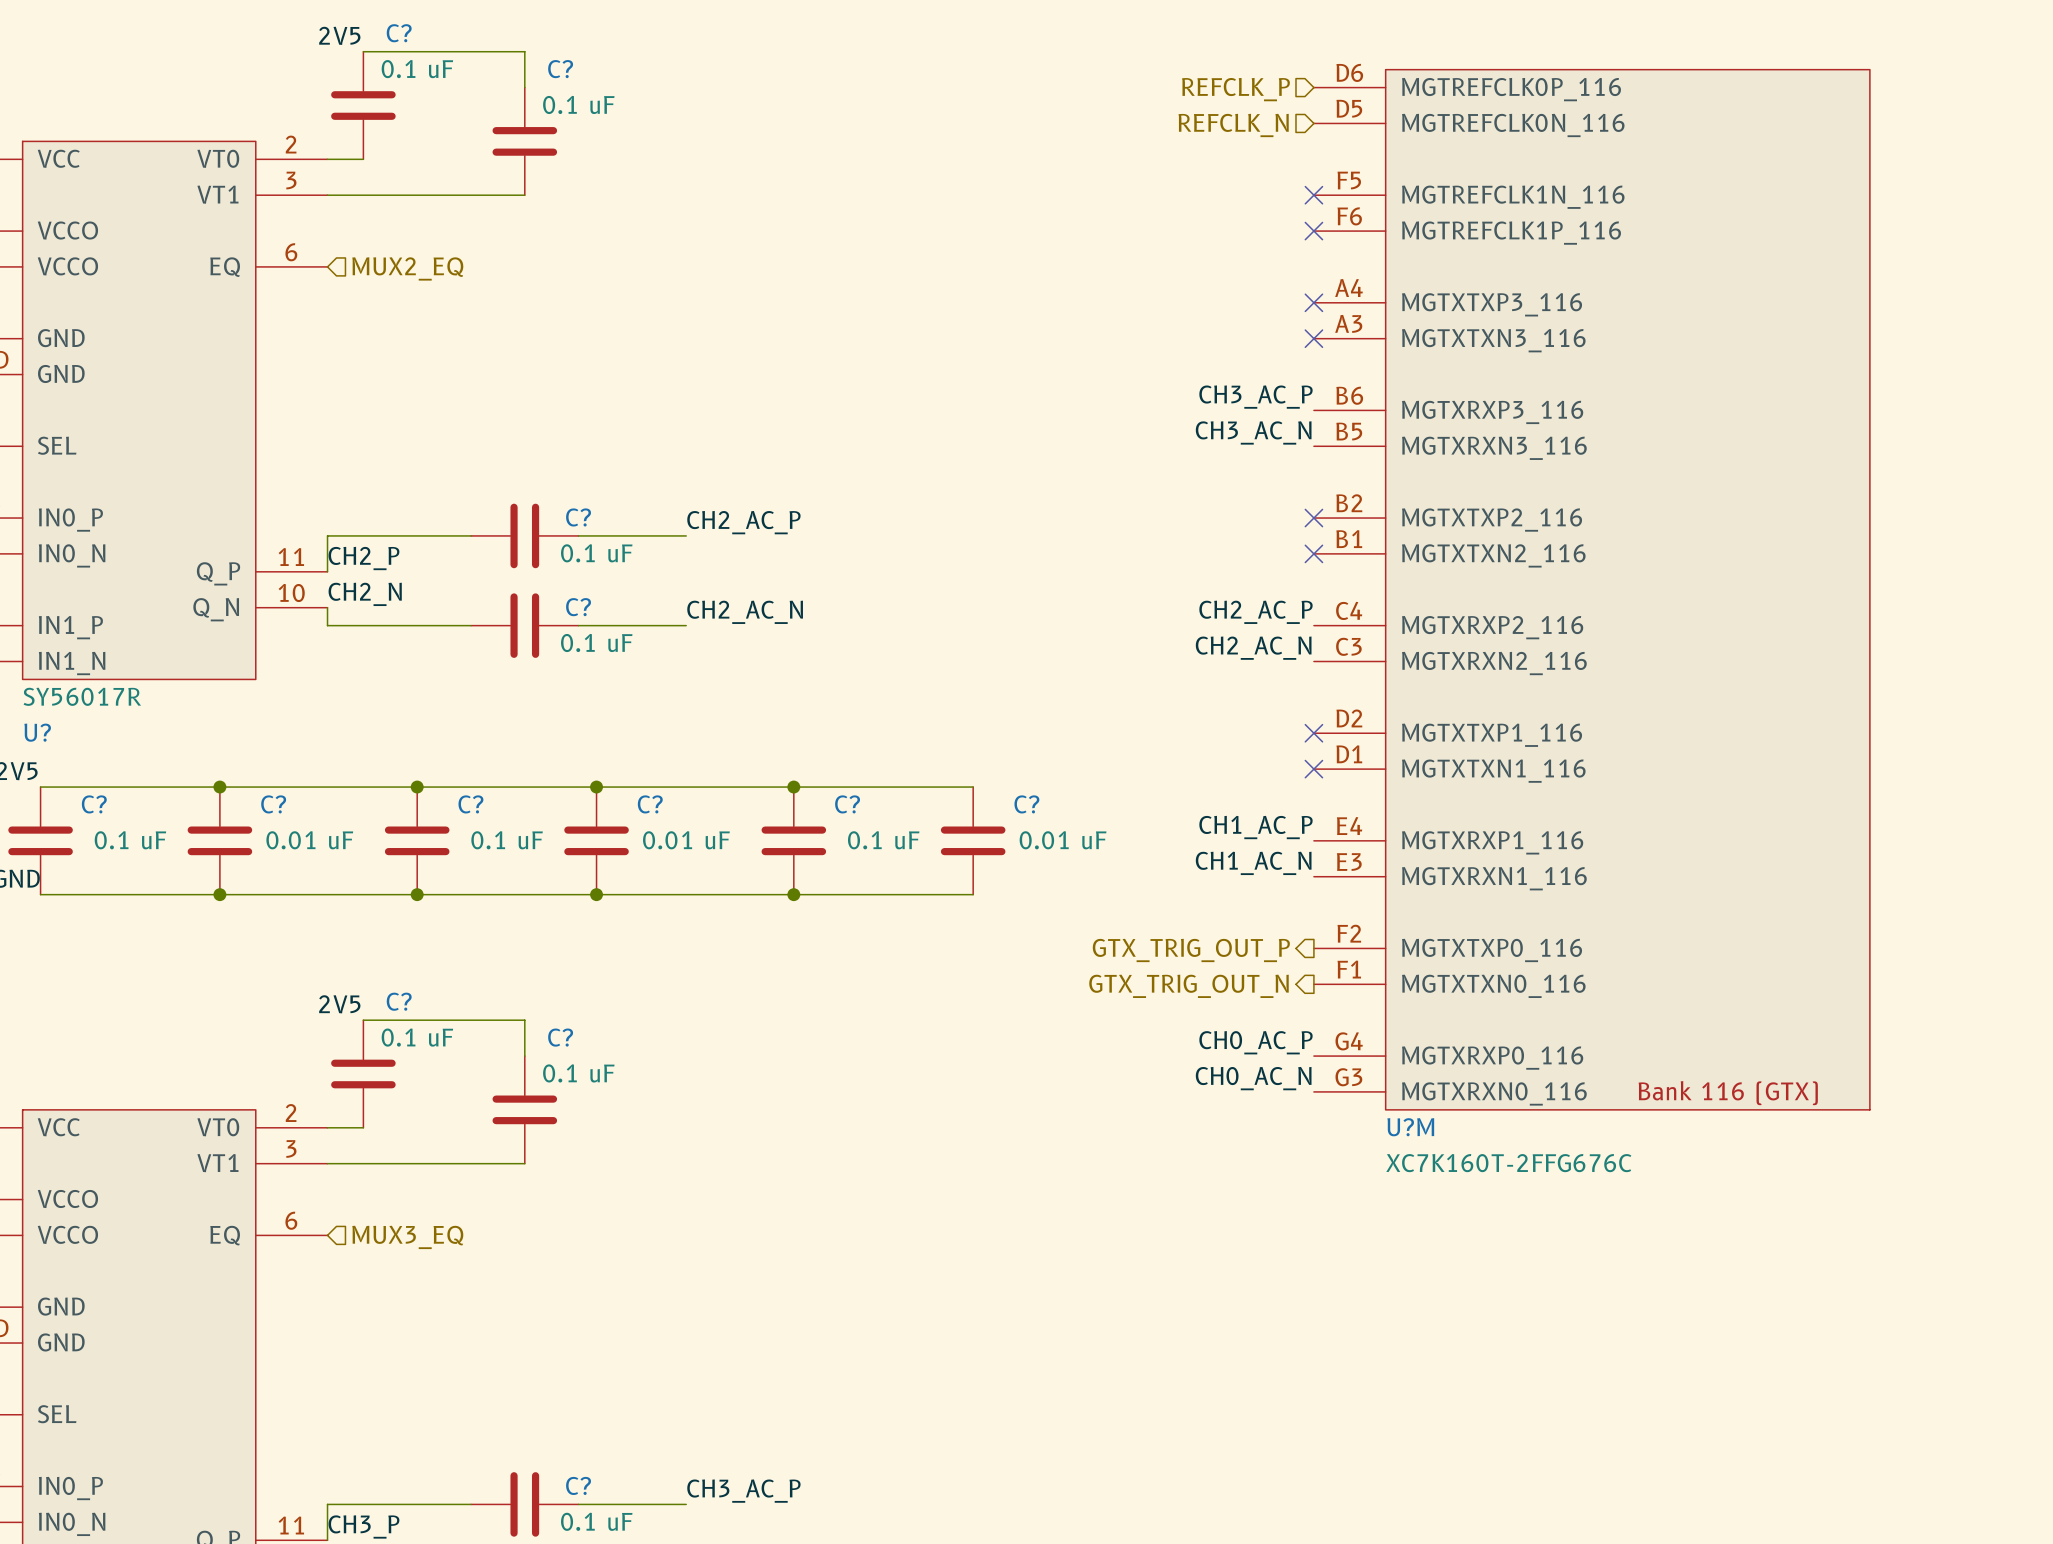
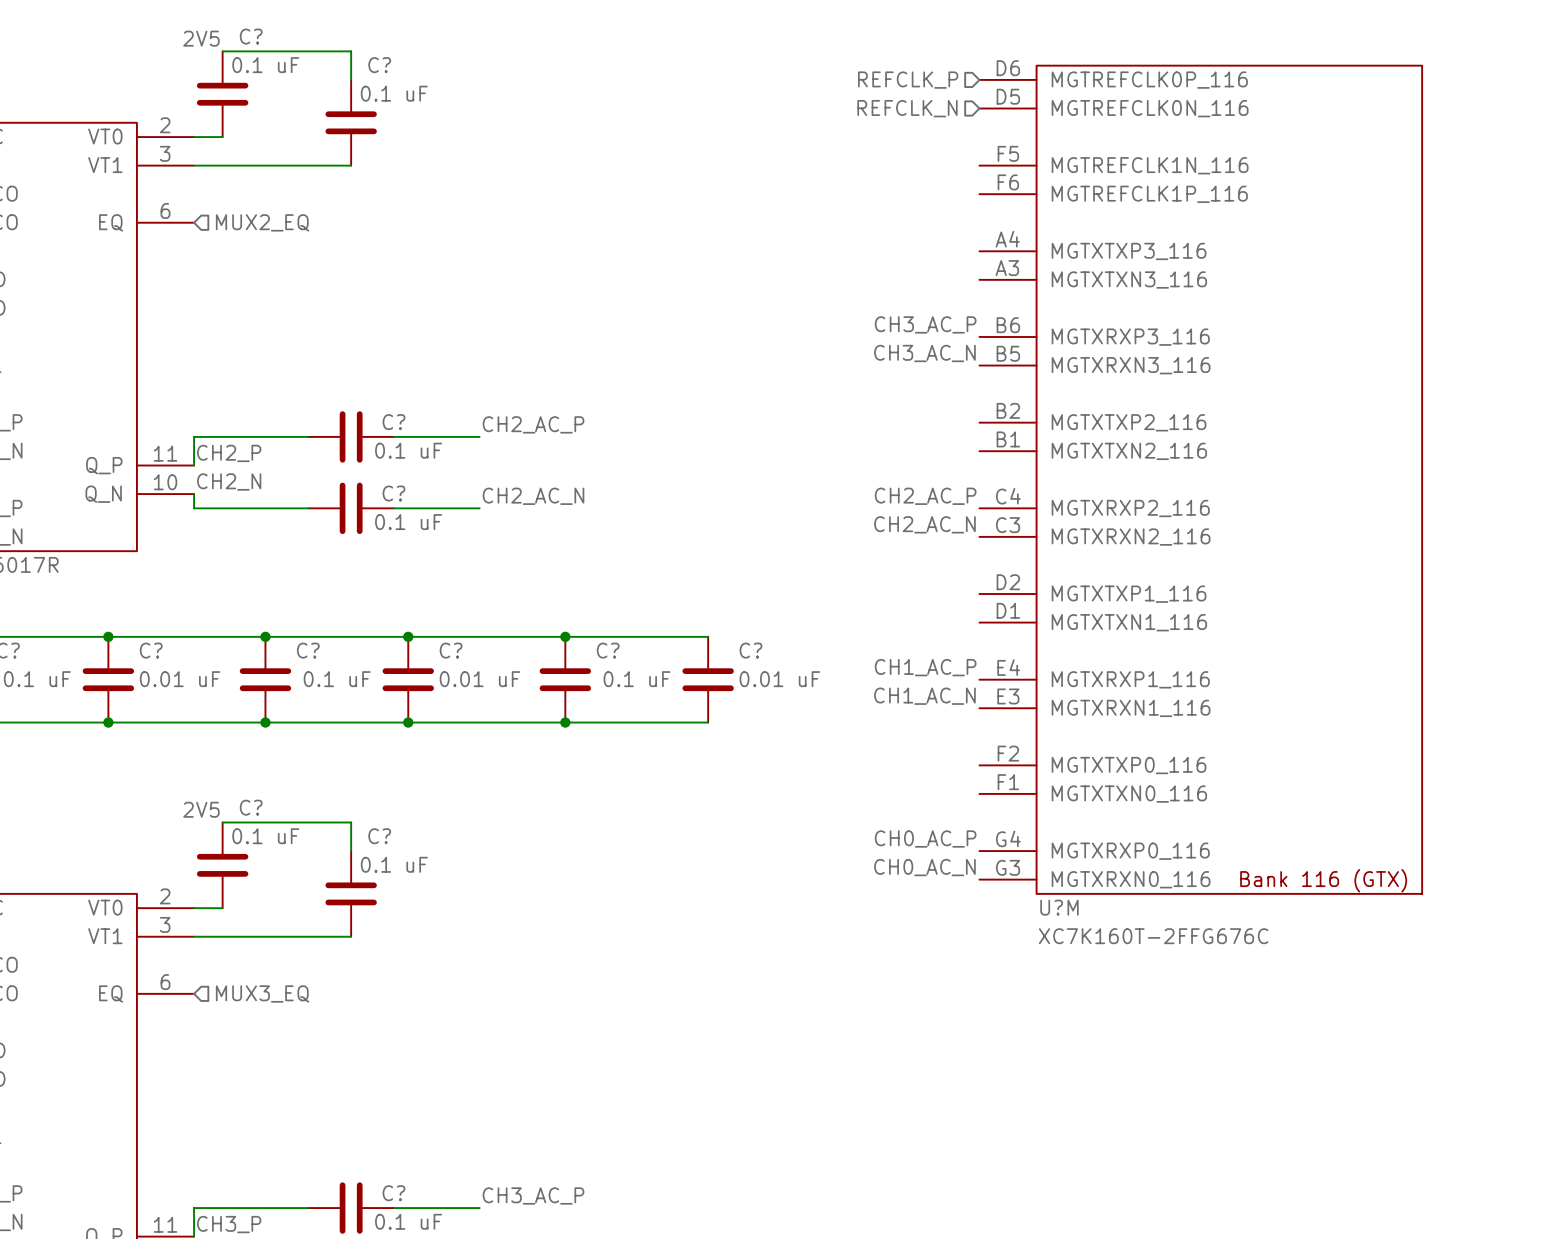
no-connect mark: (1313, 195) -> none
no-connect mark: (1313, 231) -> none
no-connect mark: (1313, 302) -> none
no-connect mark: (1313, 338) -> none
no-connect mark: (1313, 518) -> none
no-connect mark: (1313, 553) -> none
no-connect mark: (1313, 733) -> none
no-connect mark: (1313, 769) -> none
hierarchical label: GTX_TRIG_OUT_P (1191, 950) -> none
hierarchical label: GTX_TRIG_OUT_N (1188, 986) -> none

